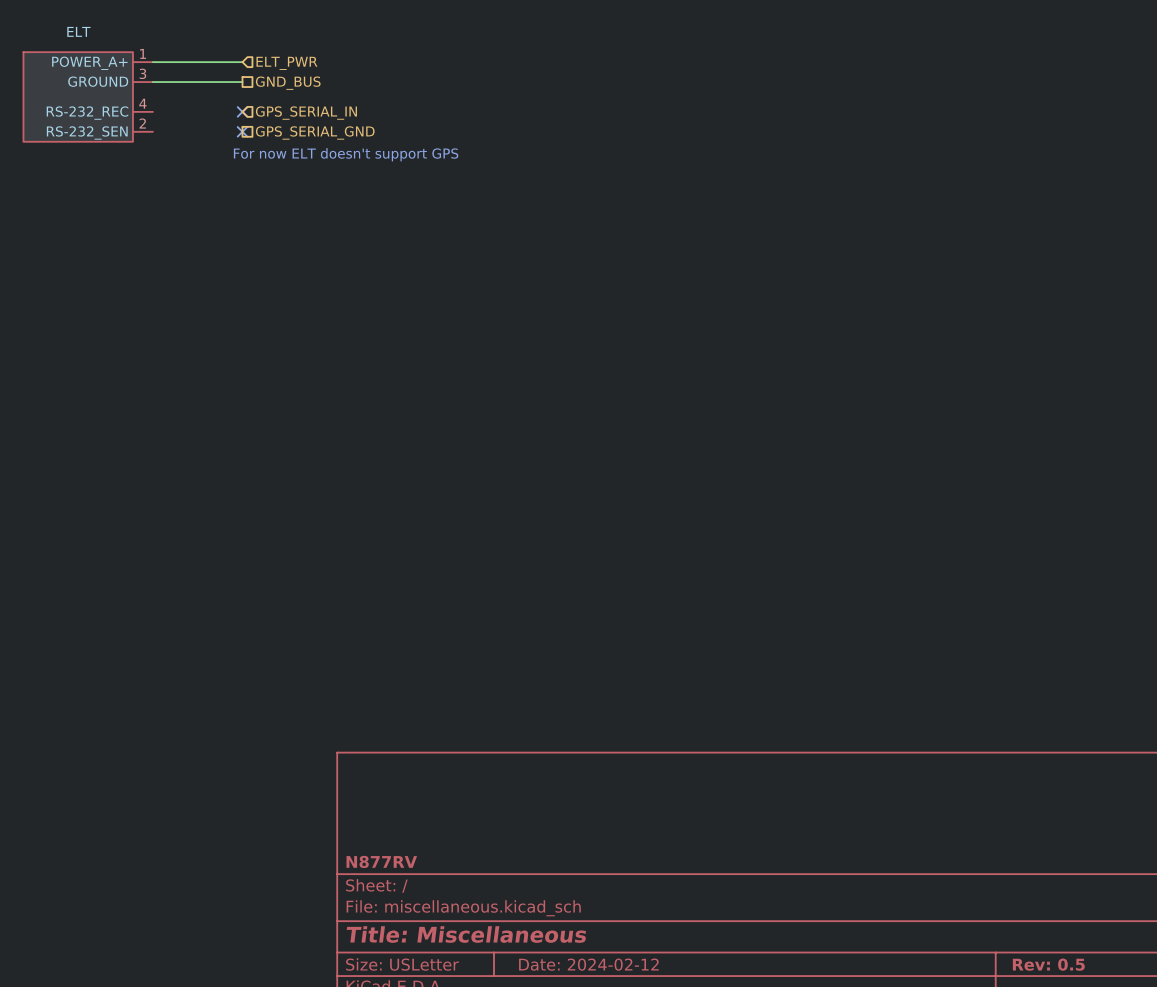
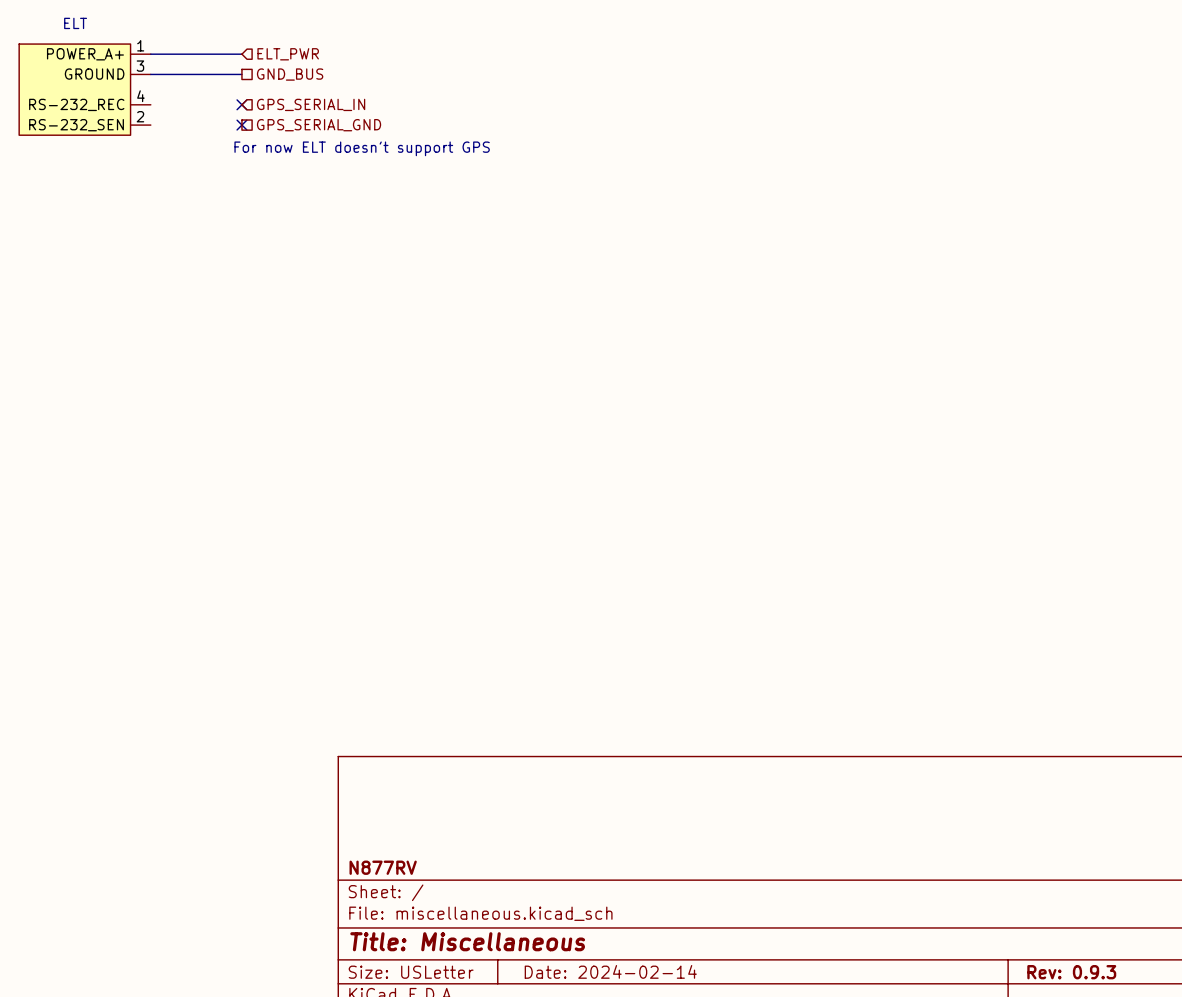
title block: Date: 2024-02-12 (588, 964) -> Date: 2024-02-14 (610, 971)
title block: Rev: 0.5 (1048, 964) -> Rev: 0.9.3 (1071, 972)

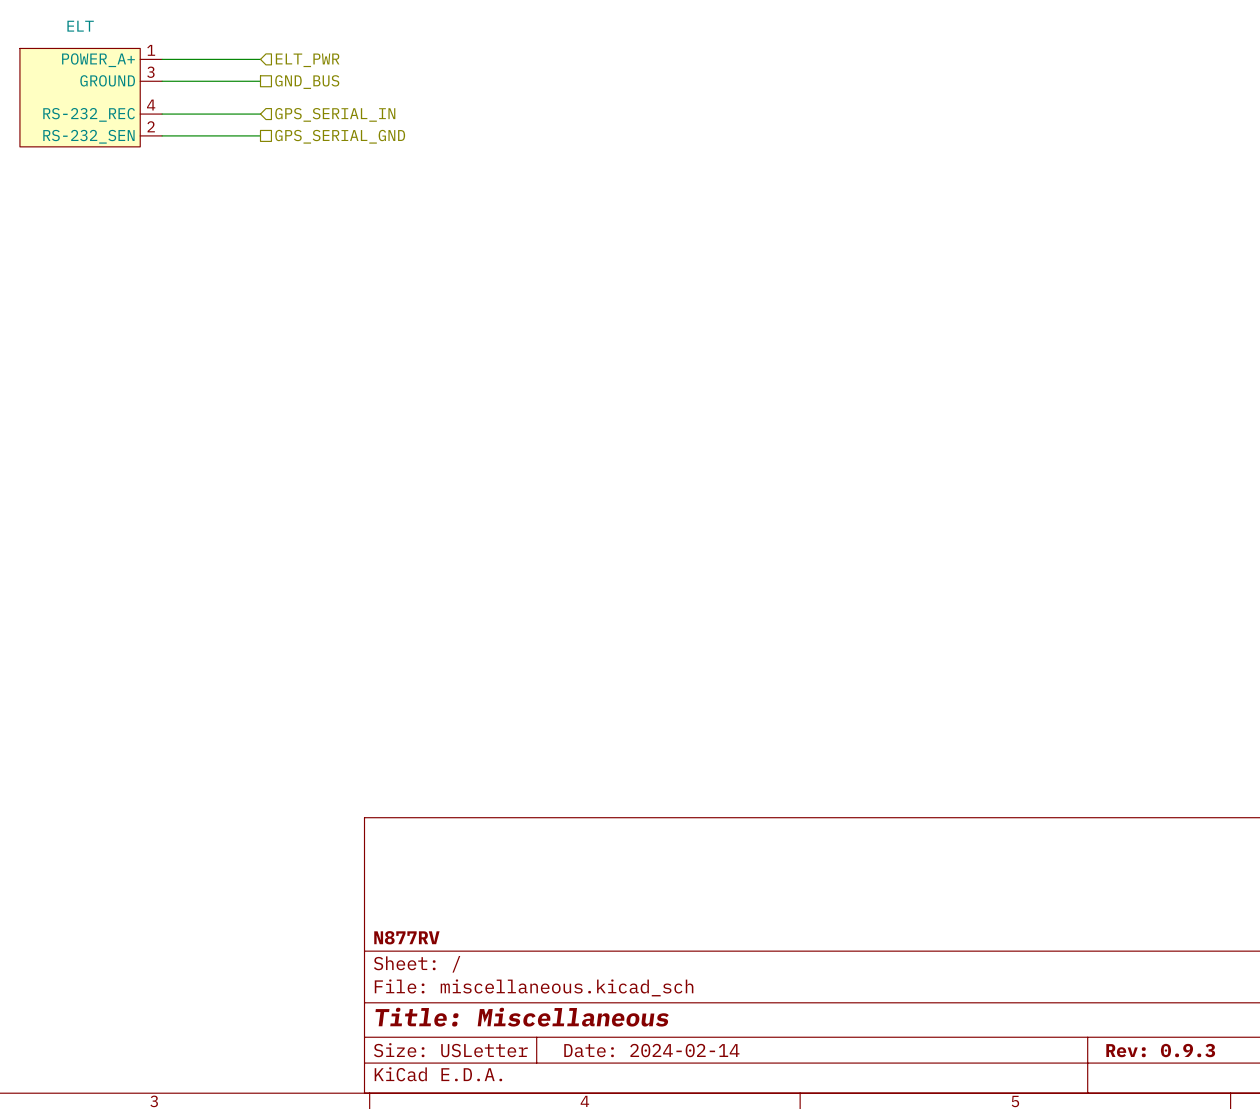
wire: none -> (162, 114) (260, 114)
no-connect mark: (241, 104) -> none
wire: none -> (162, 135) (260, 135)
no-connect mark: (241, 125) -> none
text: For now ELT doesn't support GPS (362, 148) -> none

